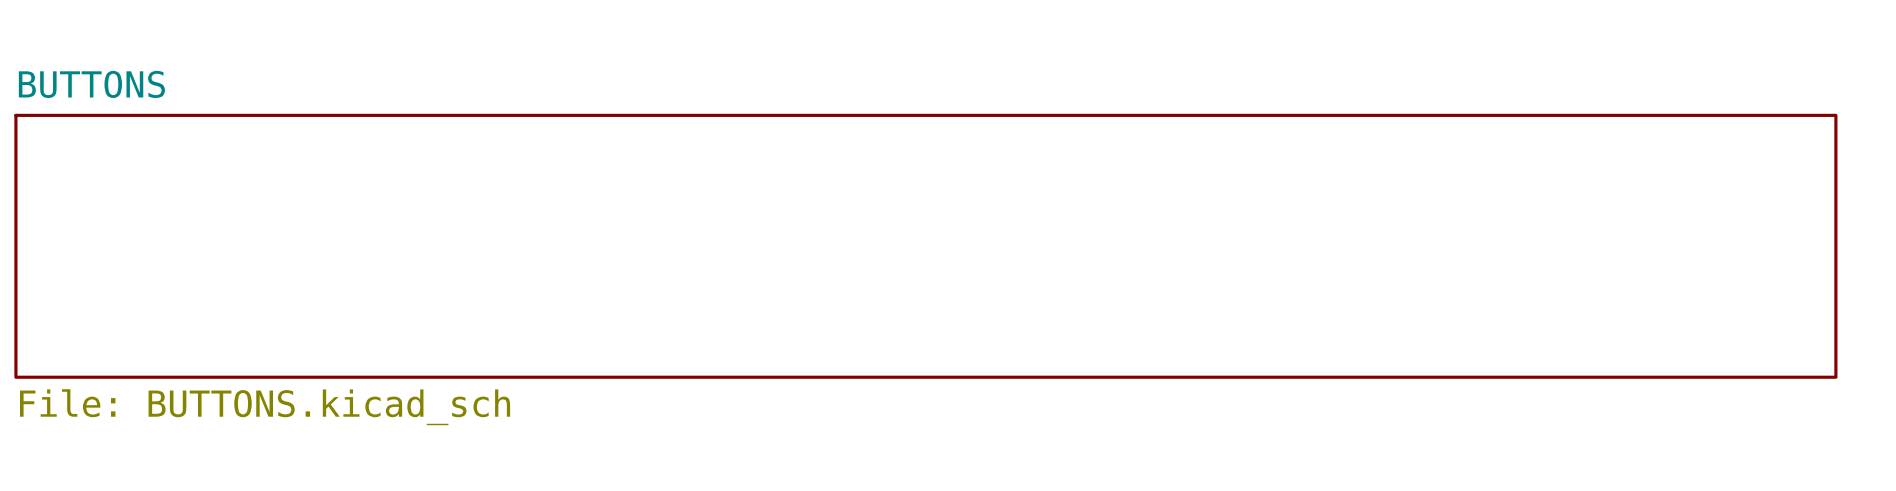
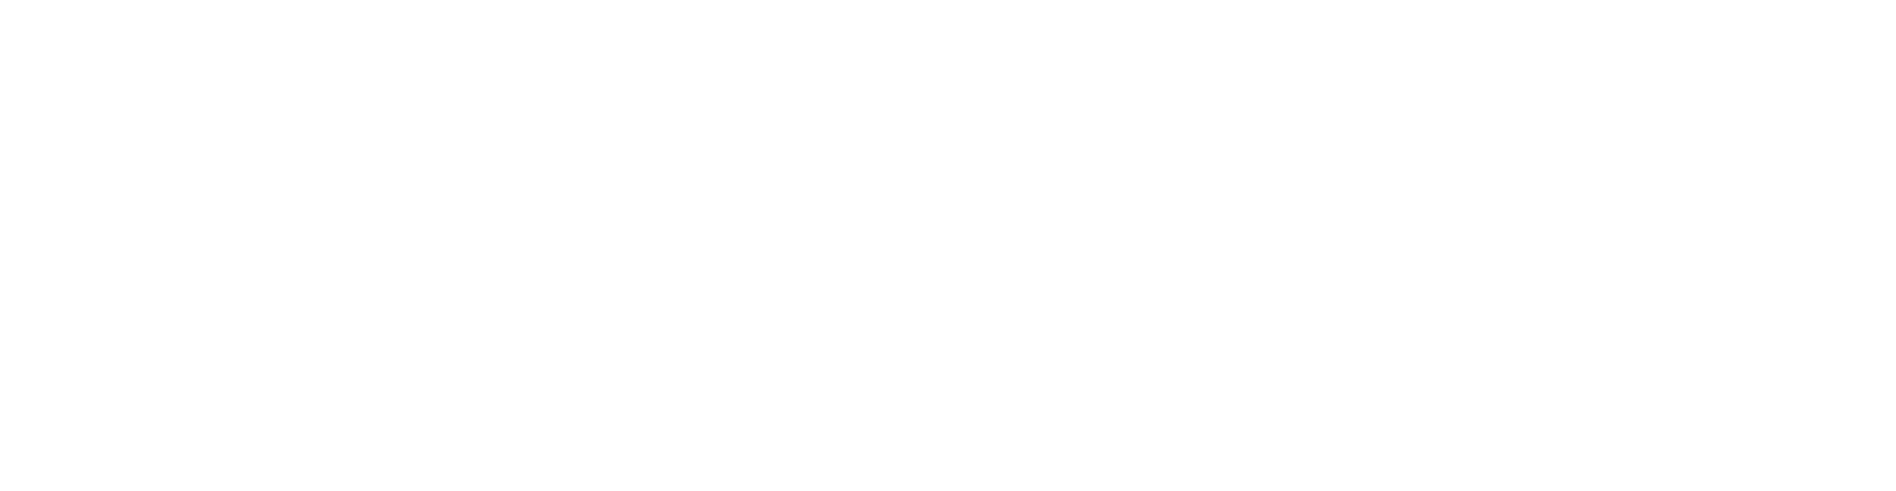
sheet BUTTONS: File: BUTTONS.kicad_sch (925, 246) -> none

